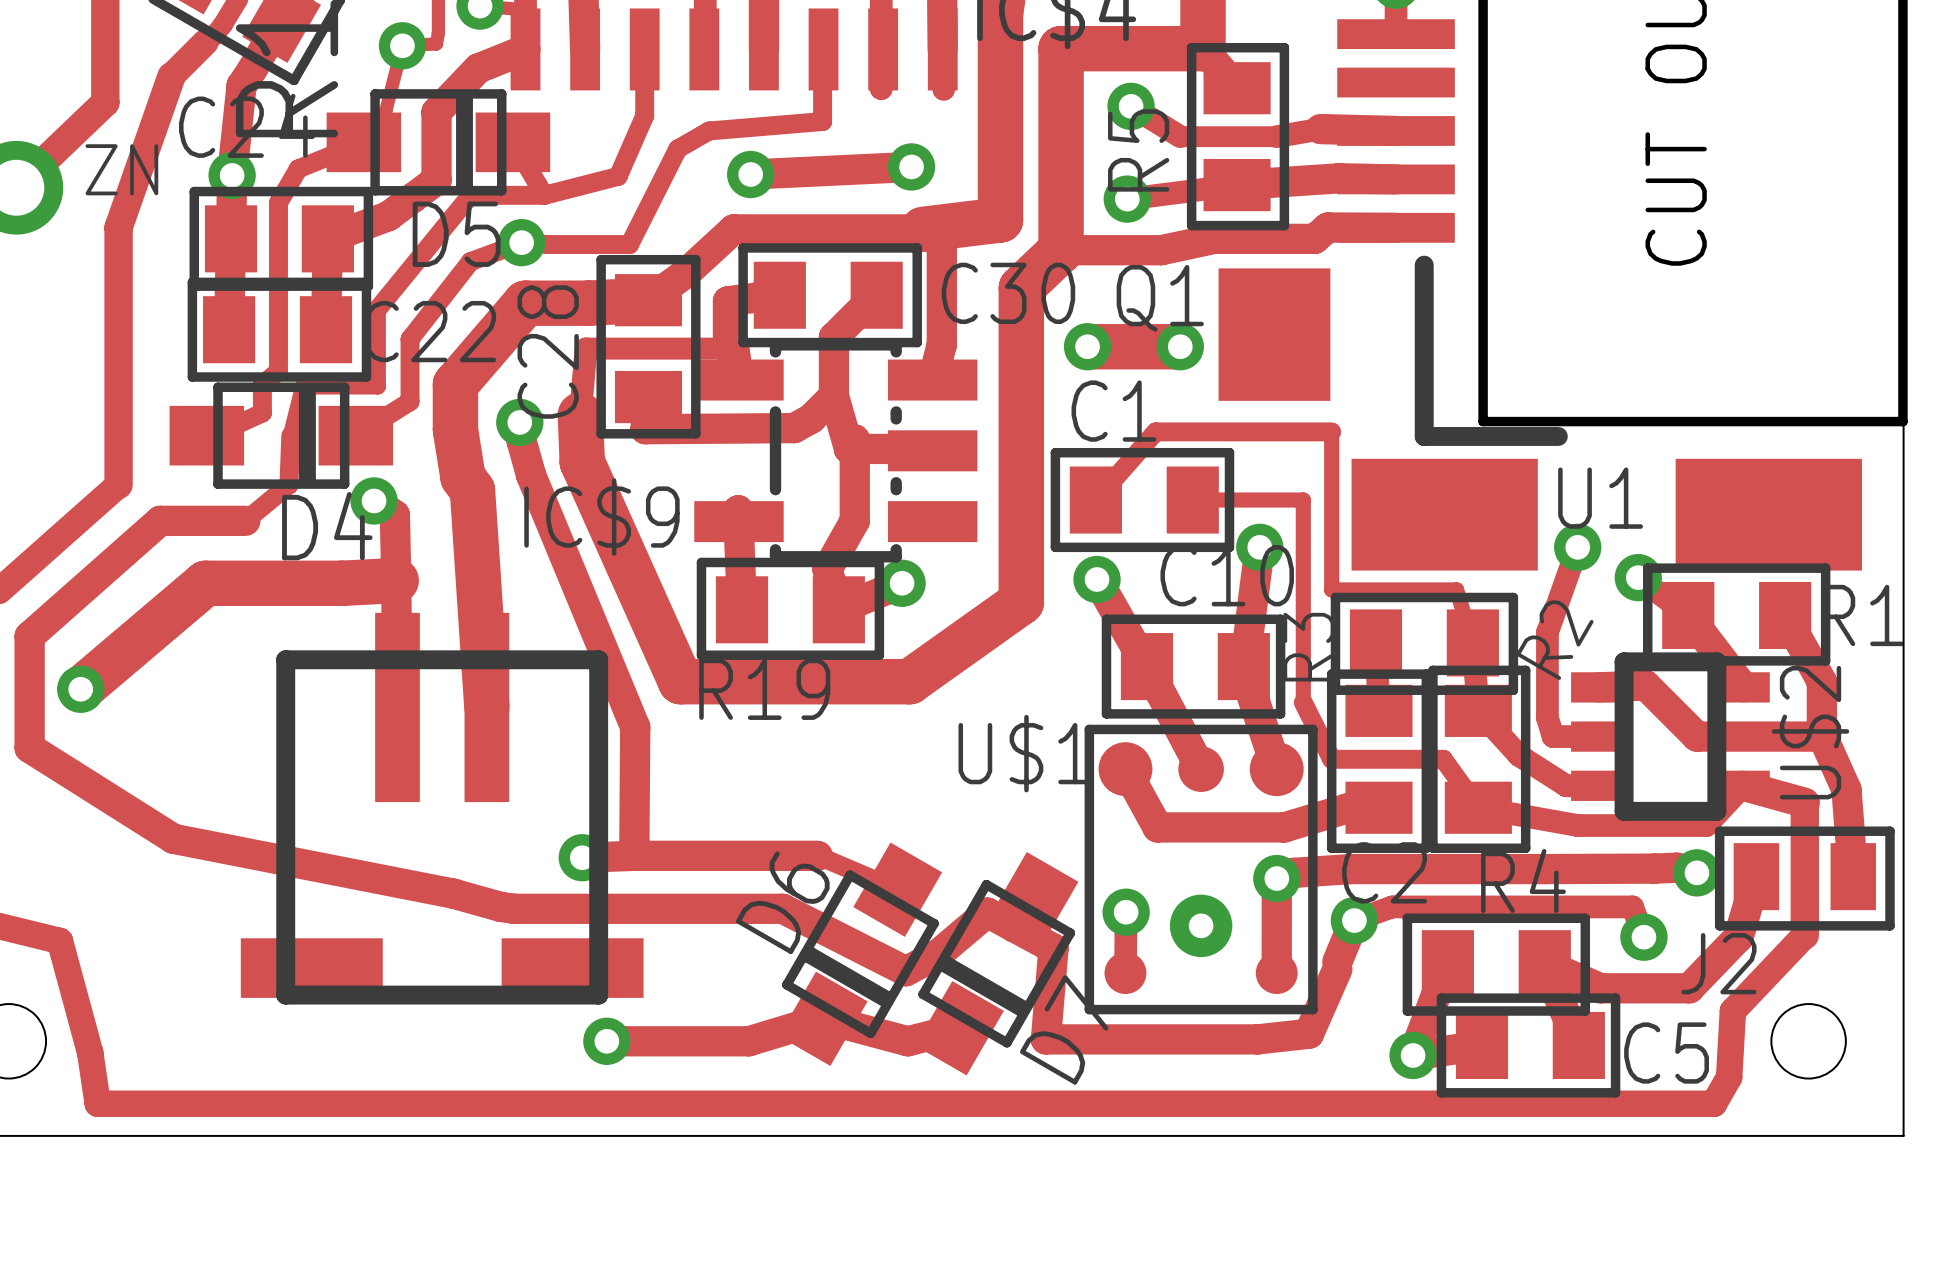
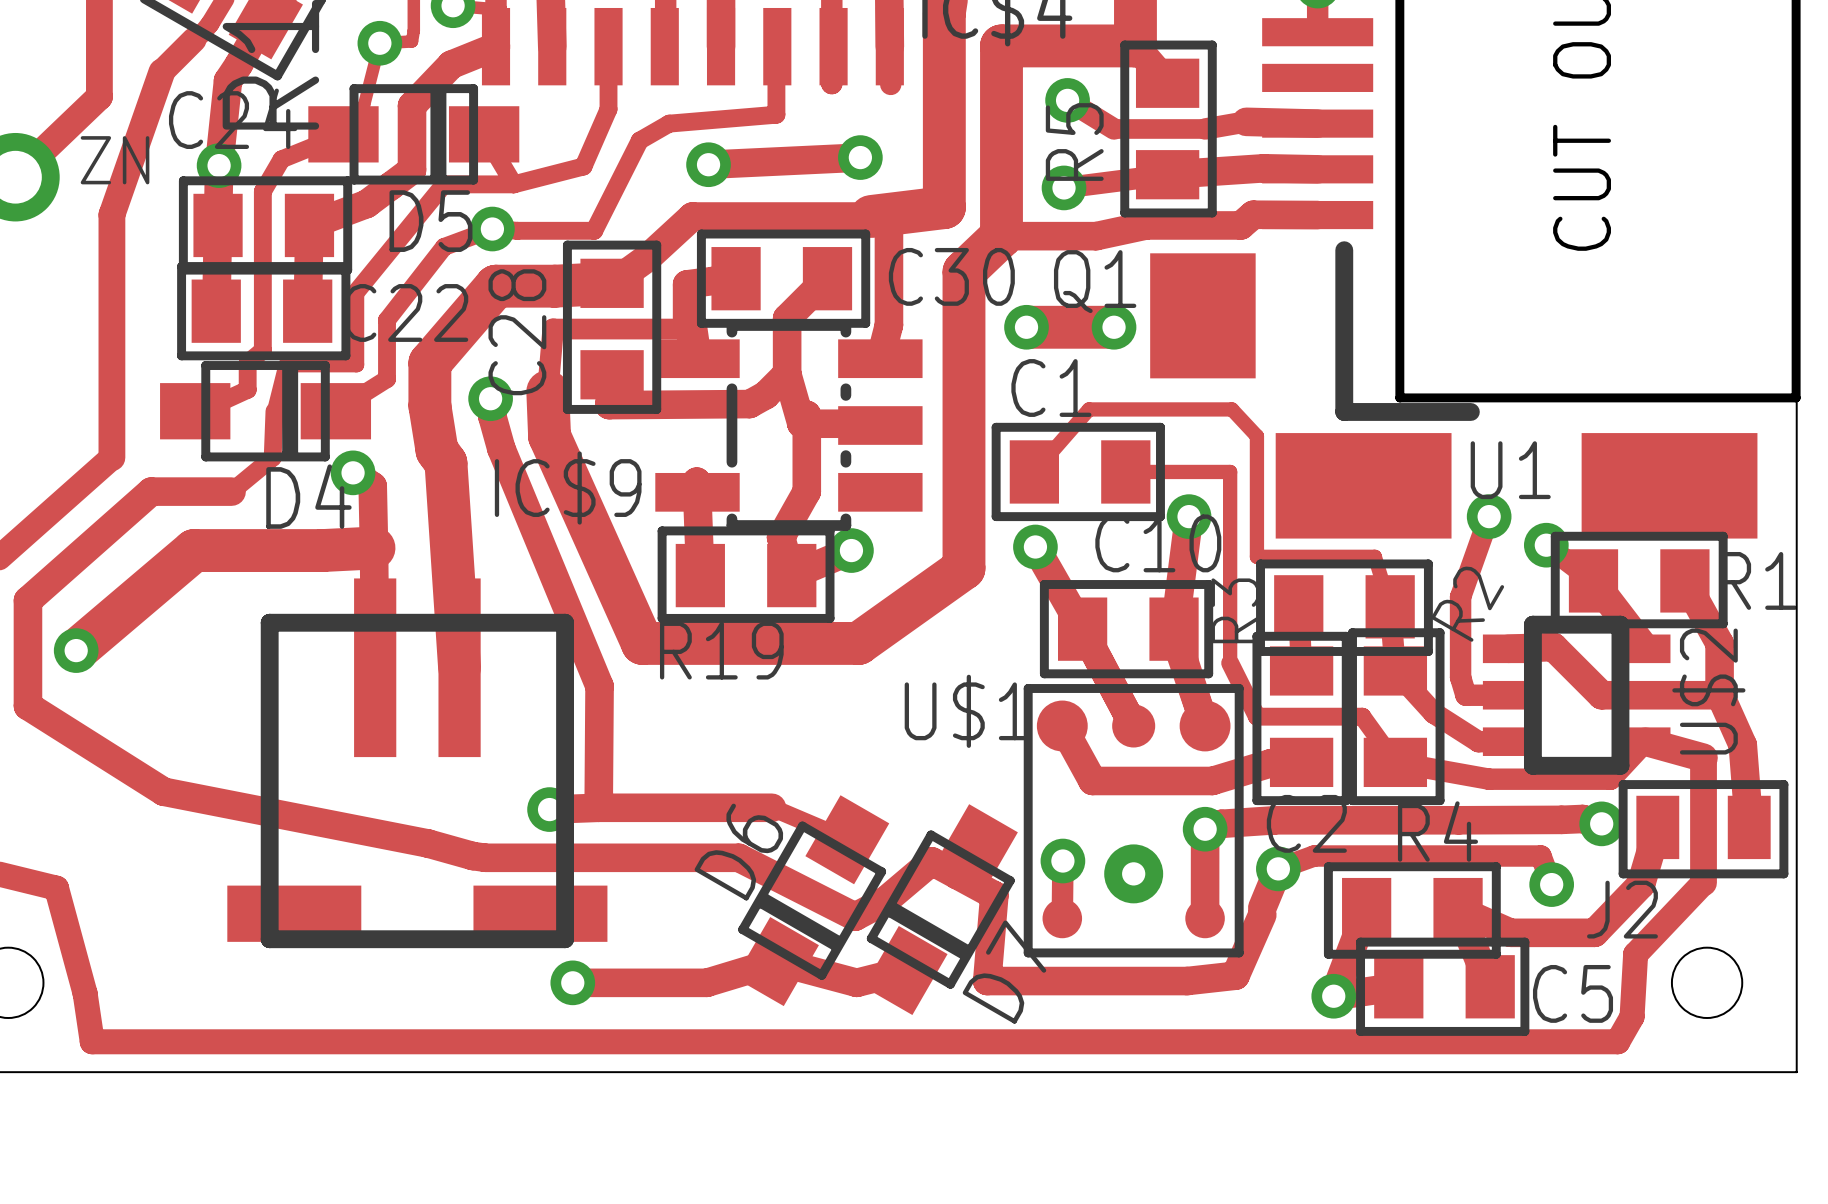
track: (1331, 462) (1331, 431) (1155, 431) (1095, 500) -> (1256, 436) (1231, 409) (1089, 409) (1034, 471)

